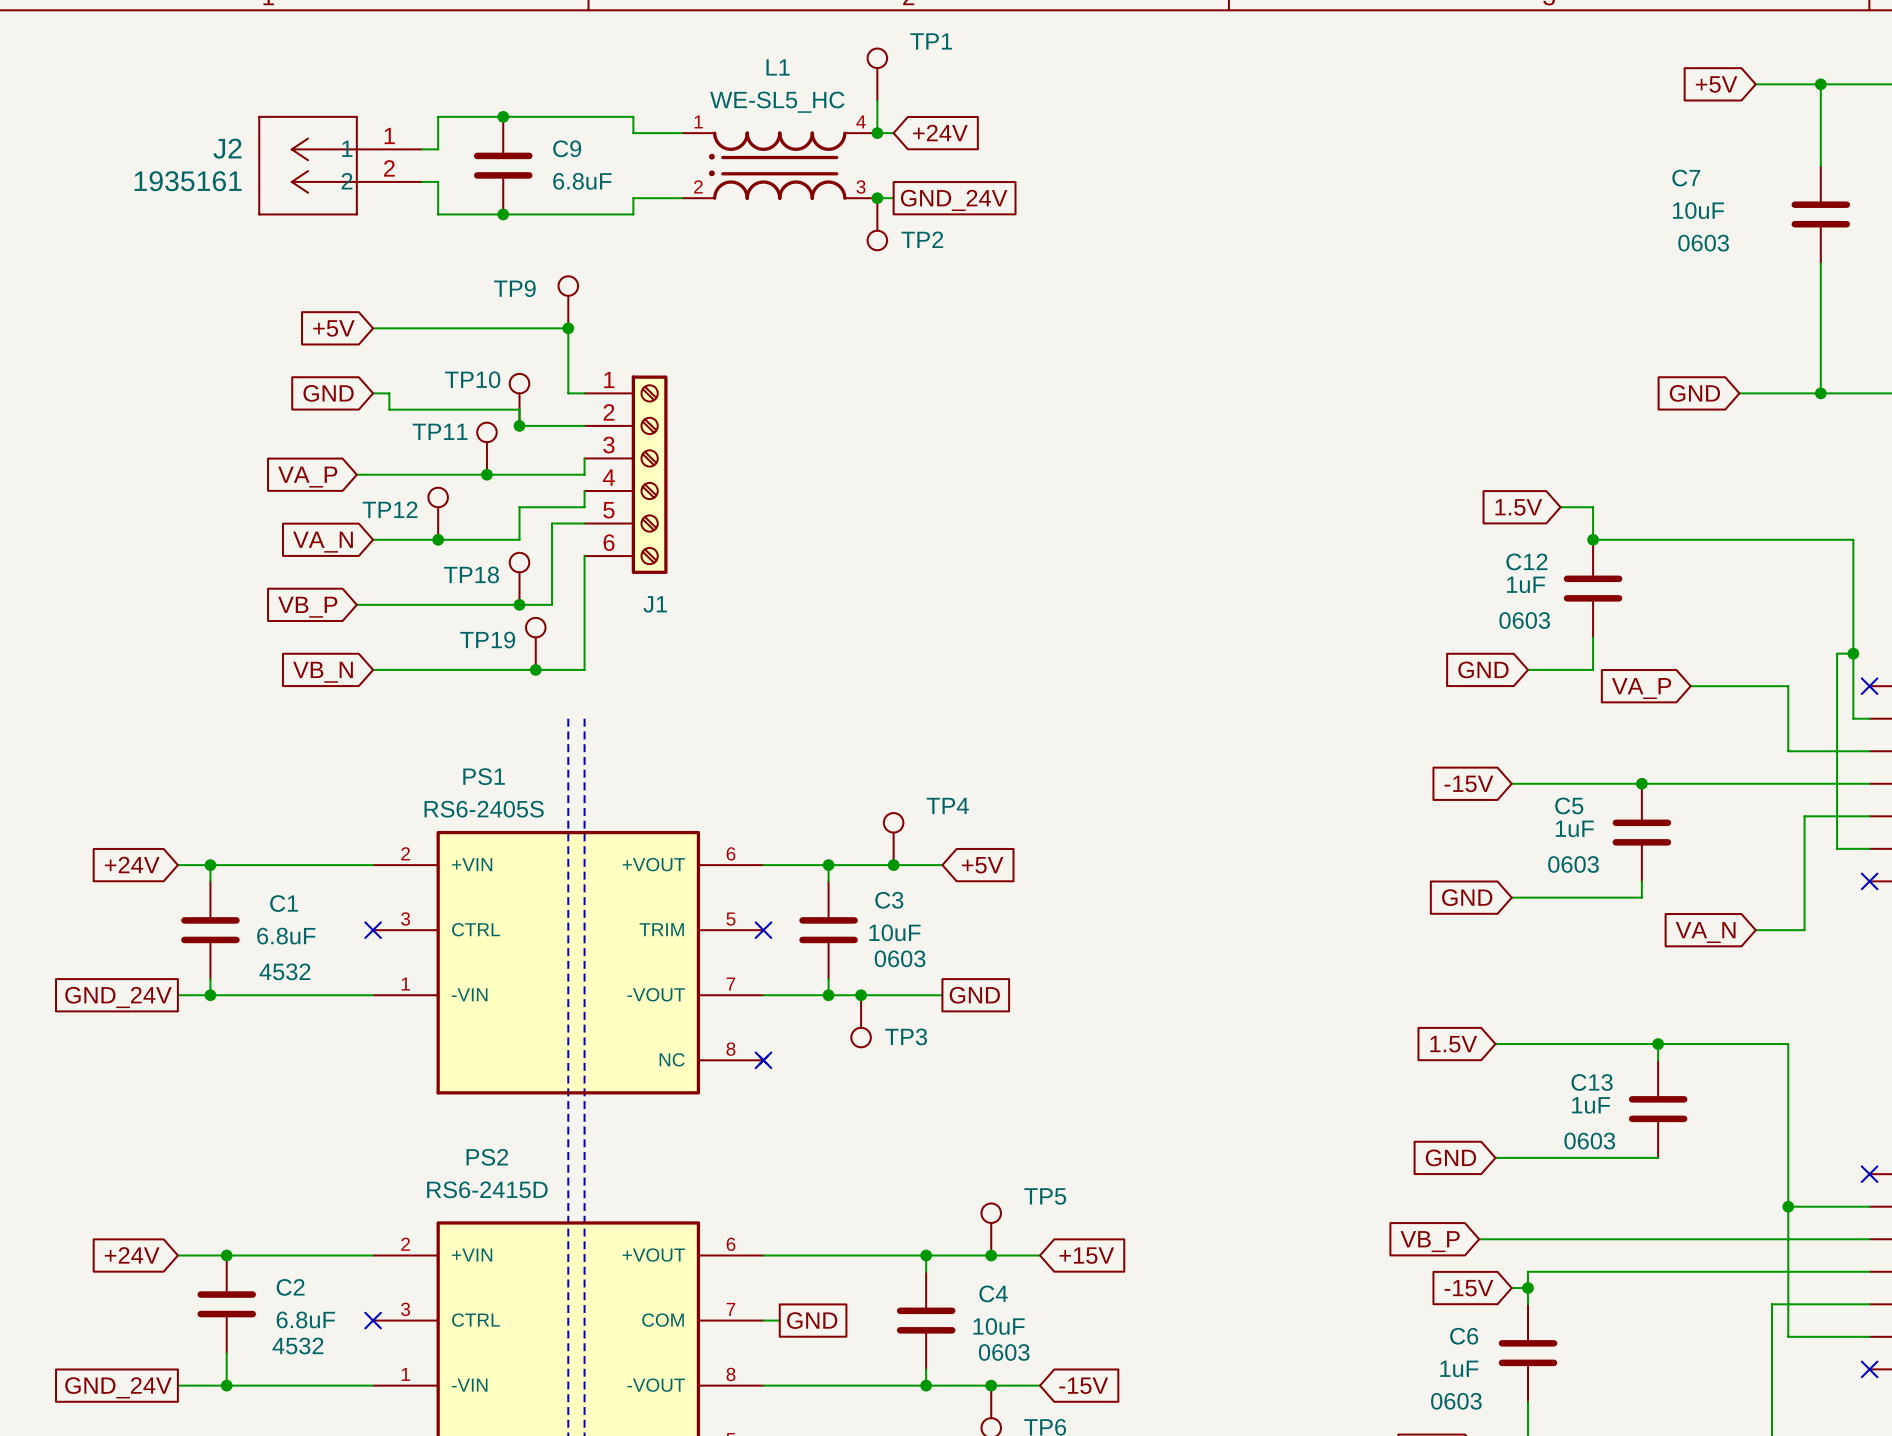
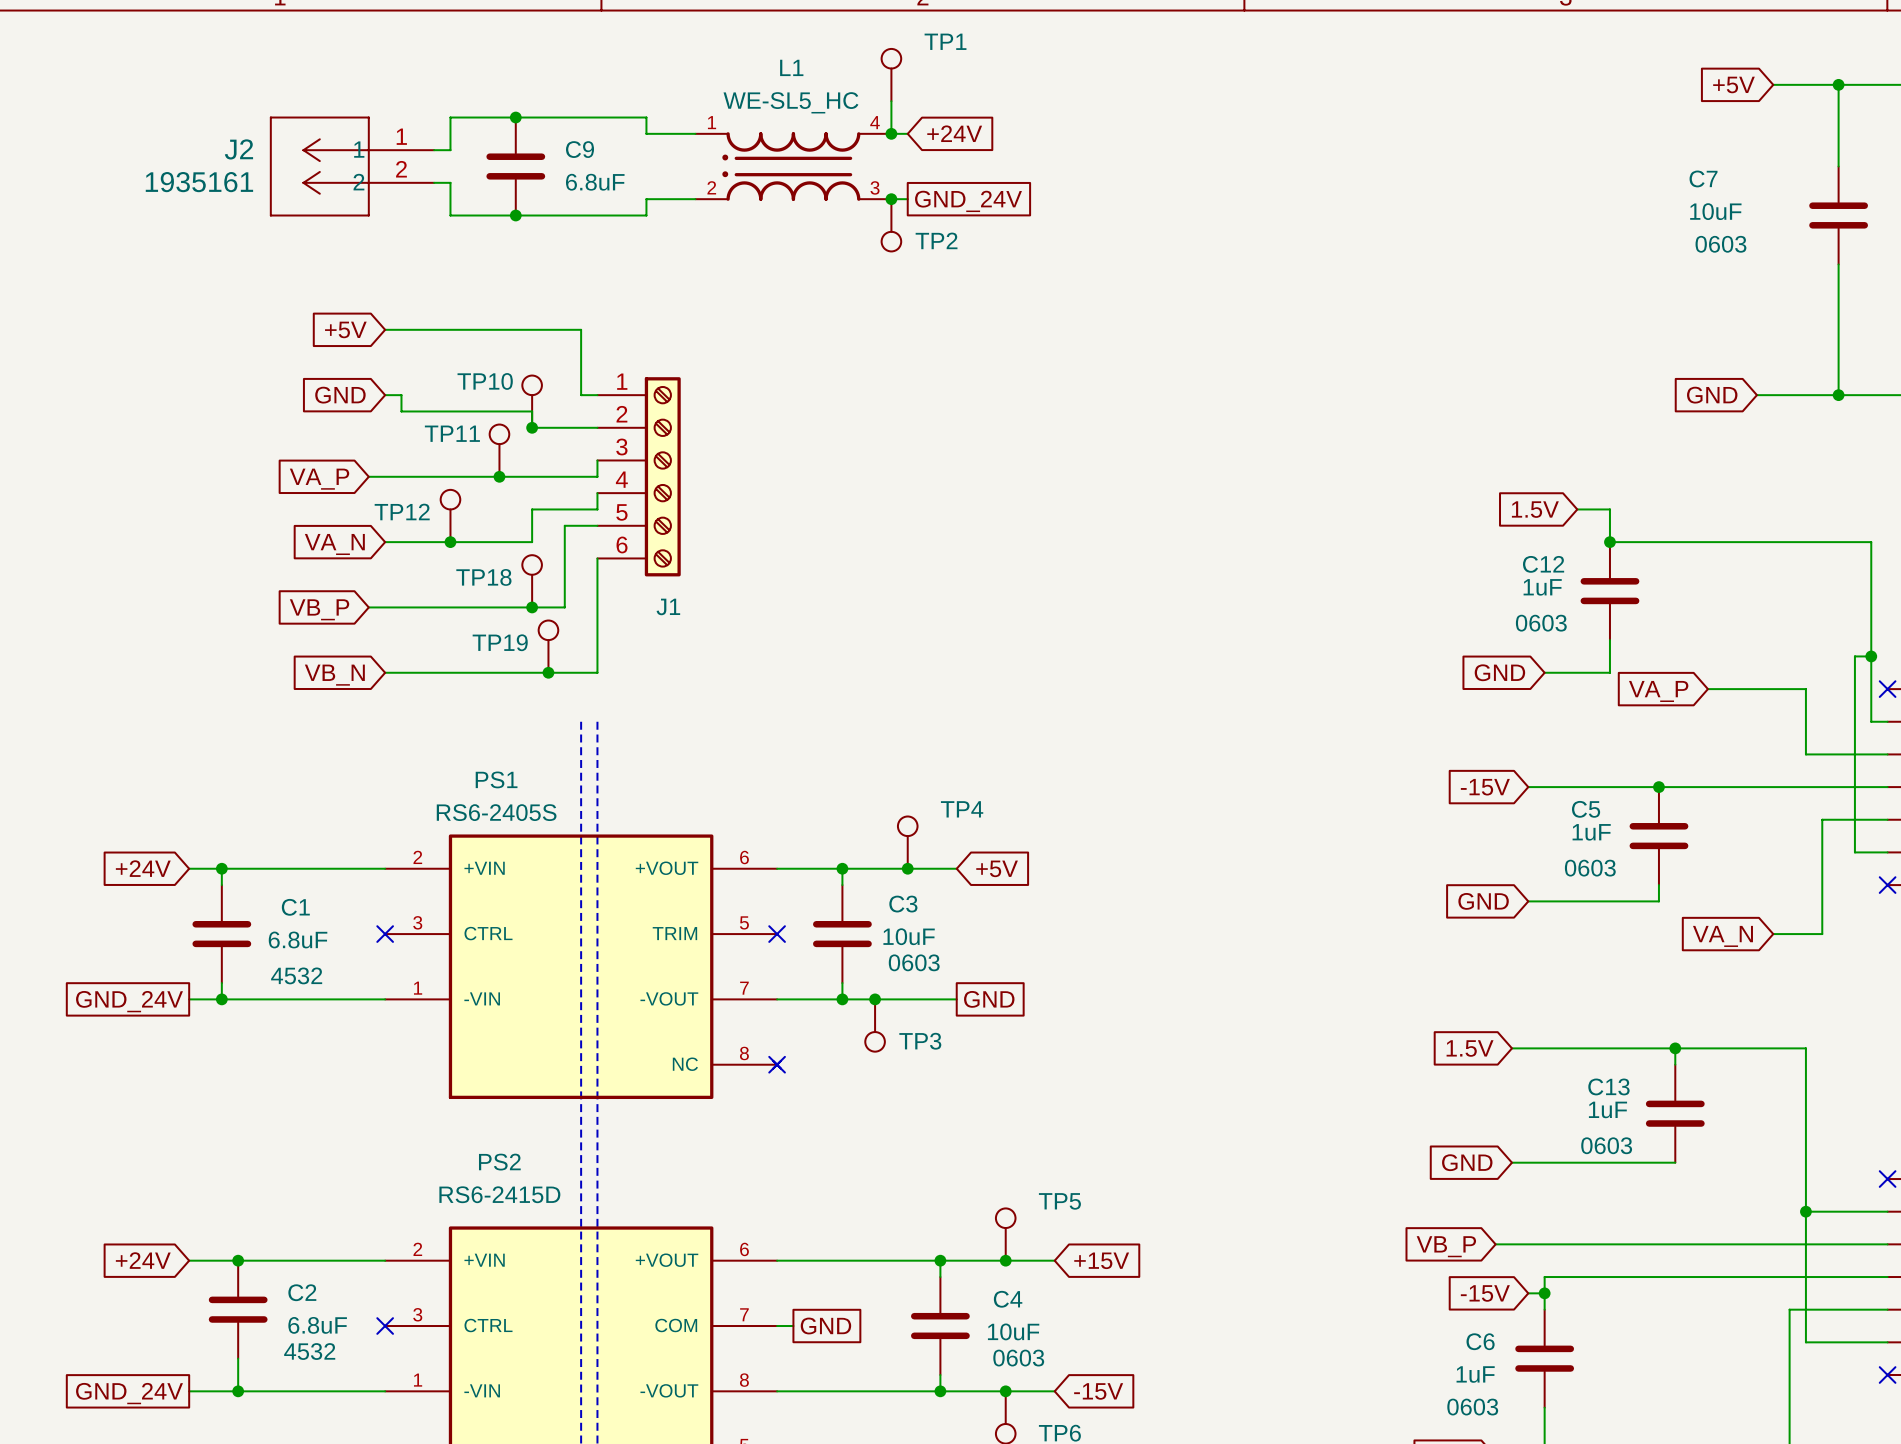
TP9: (568, 302) -> none
junction: (568, 328) -> none

